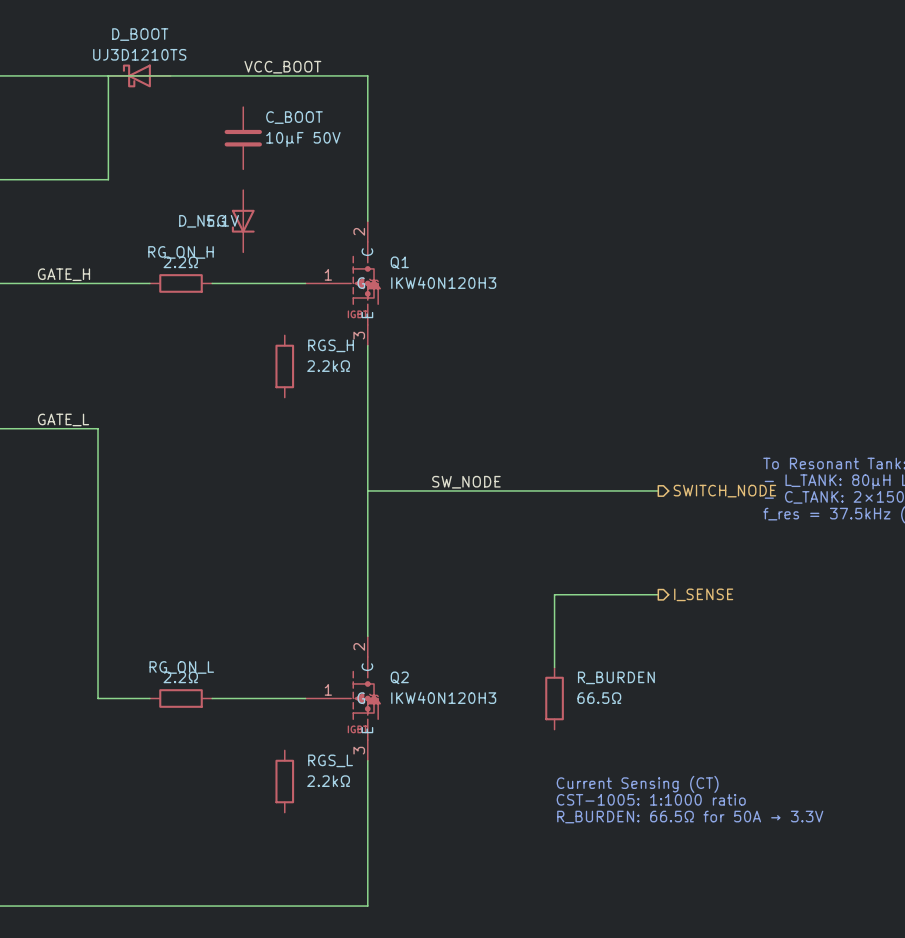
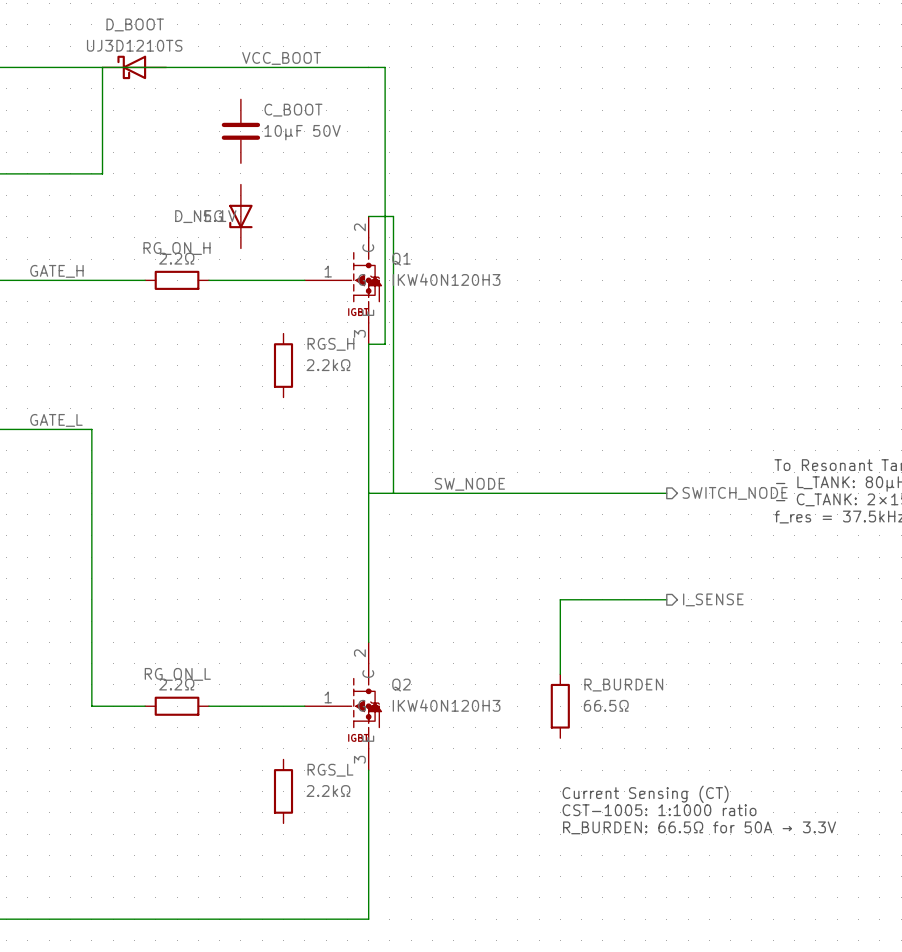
wire: (367, 75) (367, 221) -> (368, 67) (385, 67) (385, 344) (368, 344)
wire: none -> (368, 216) (393, 216) (393, 493)

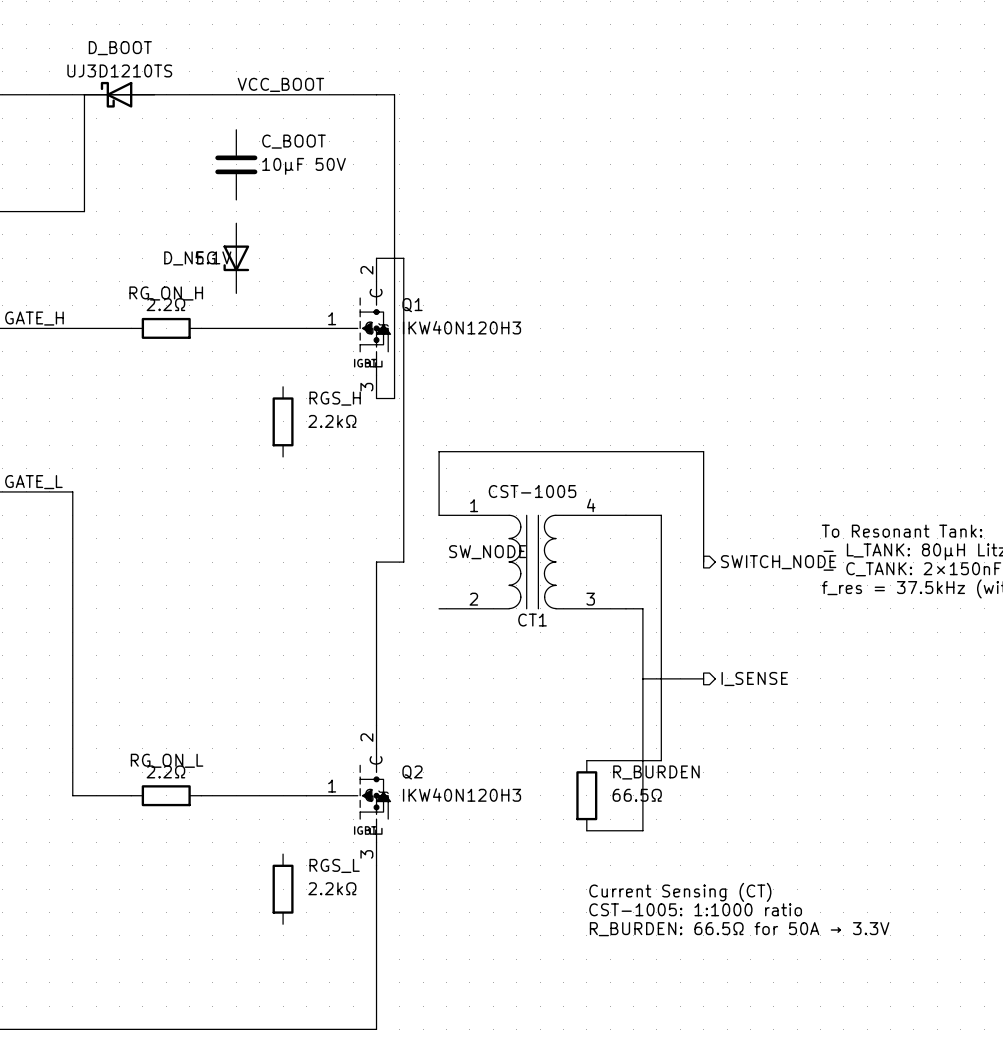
wire: (368, 344) (368, 493) -> none
wire: (393, 493) (666, 493) -> (439, 515) (439, 451) (703, 451) (703, 562)
CT1: none -> CST-1005 (532, 562)
wire: none -> (625, 608) (642, 608) (642, 830) (586, 830)
wire: (611, 599) (560, 599) (560, 674) -> (625, 515) (661, 515) (661, 760) (586, 760)

